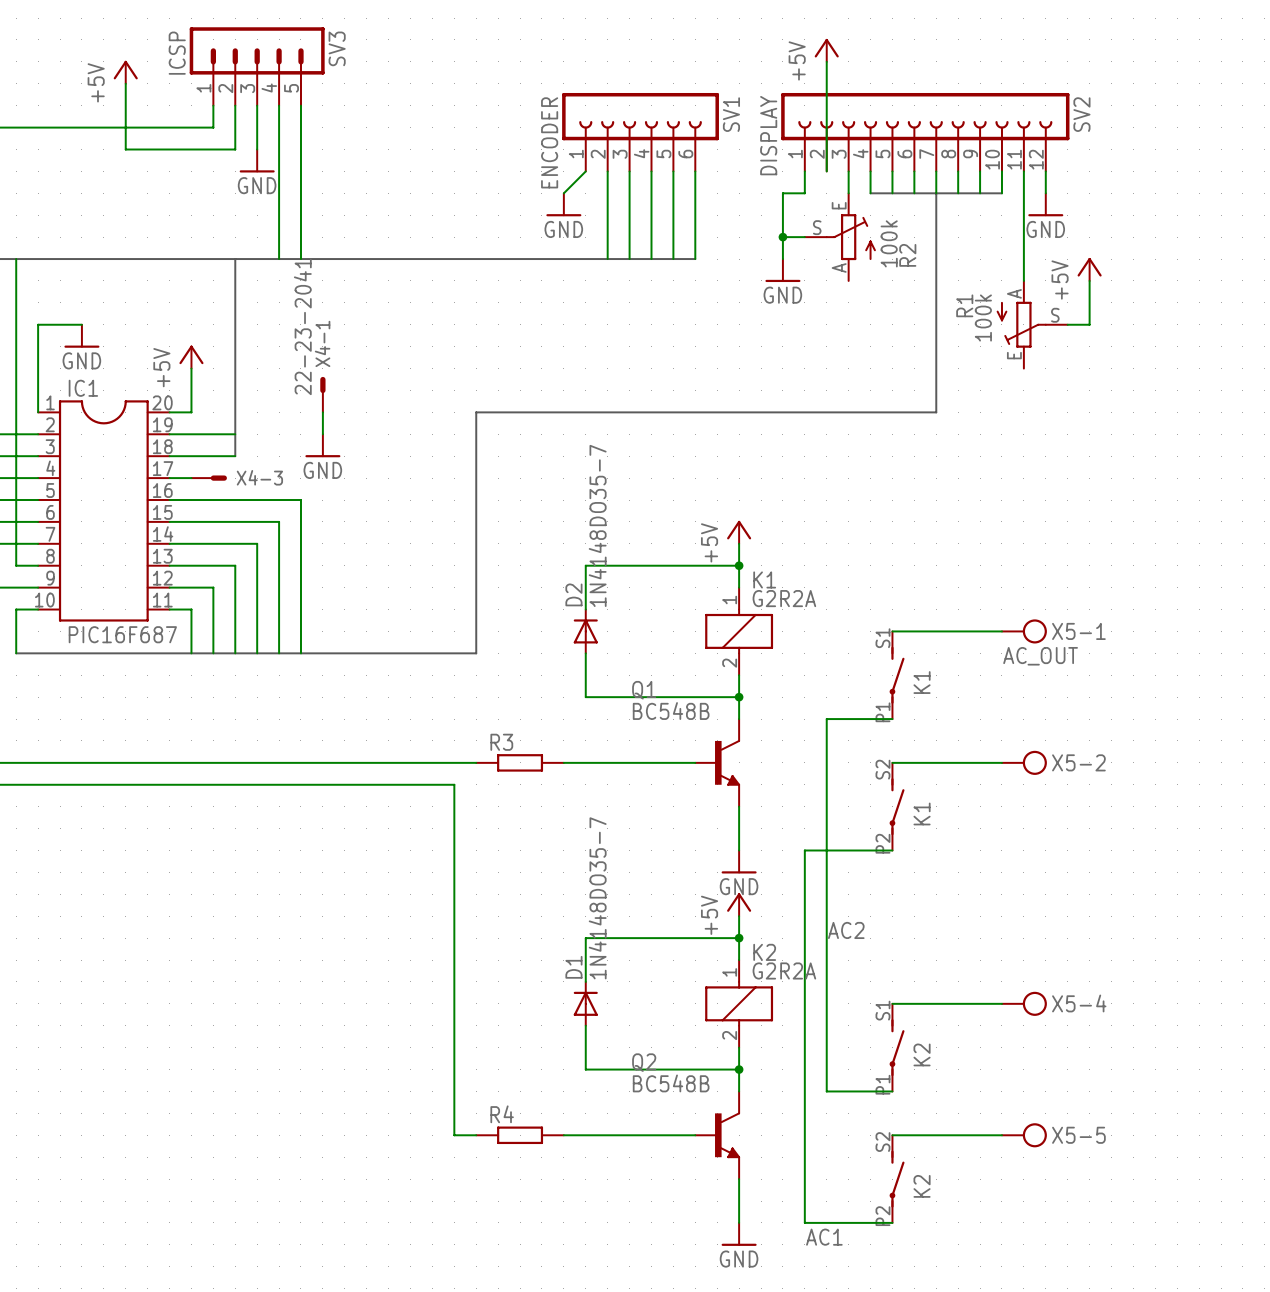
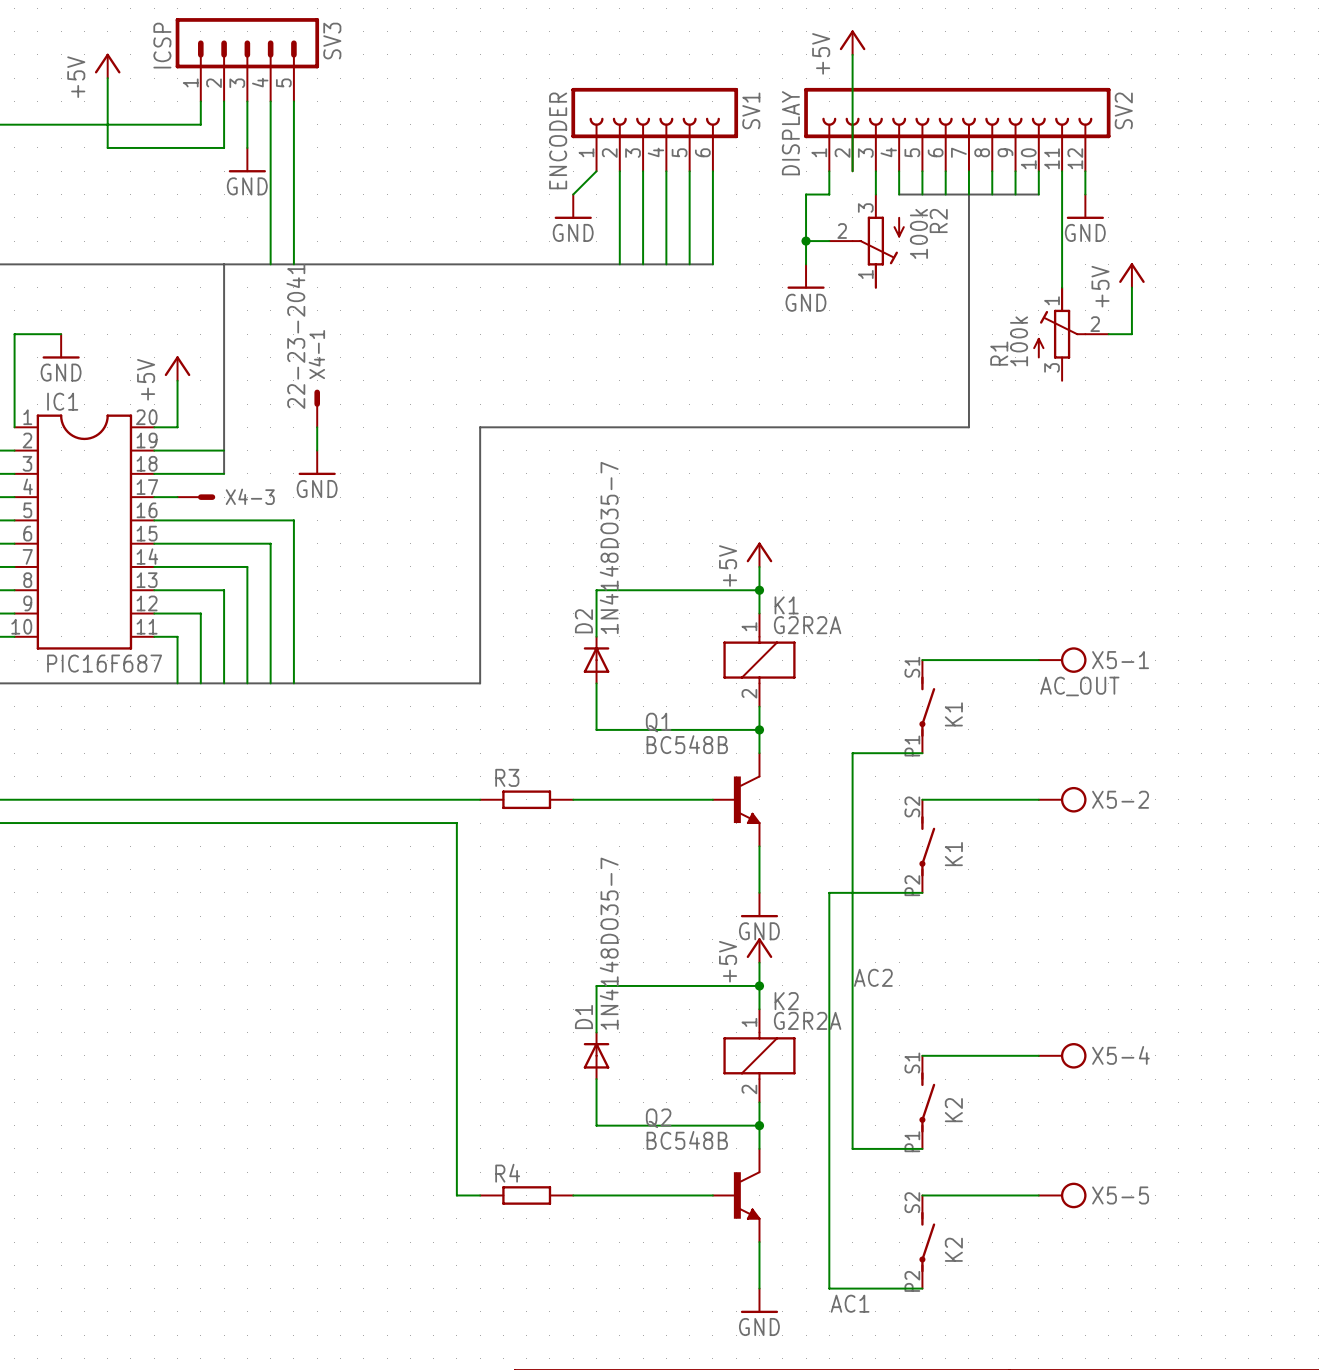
R2 symbol: [804, 193, 876, 281] -> [829, 194, 905, 289]
R2 name position: R2 (907, 255) -> R2 (938, 220)
R1 symbol: [996, 280, 1068, 369] -> [1033, 286, 1109, 381]
R1 name position: R1 (964, 305) -> R1 (999, 353)

